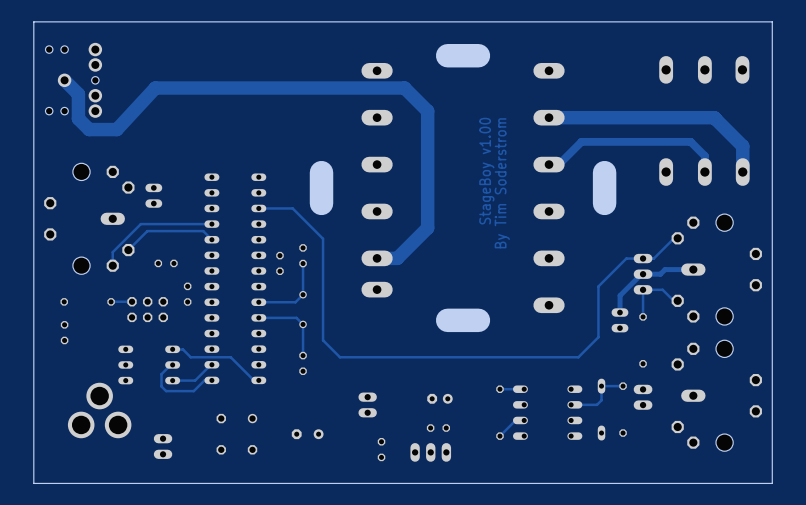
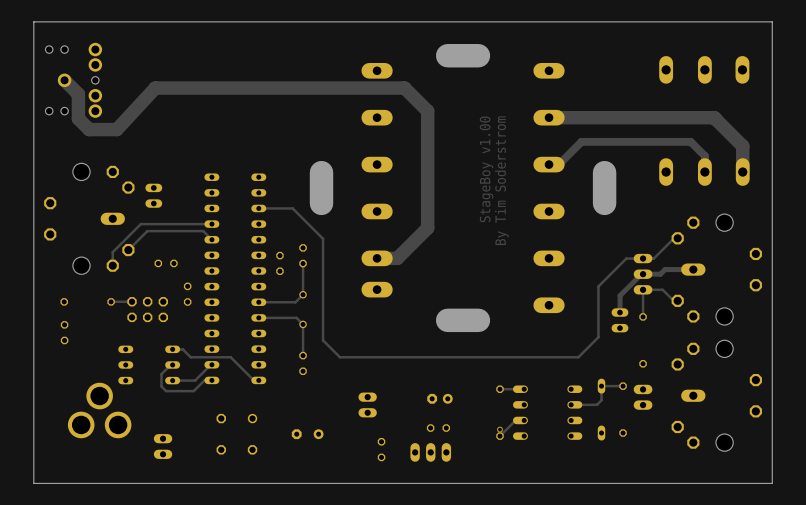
via: none -> (499, 429)

